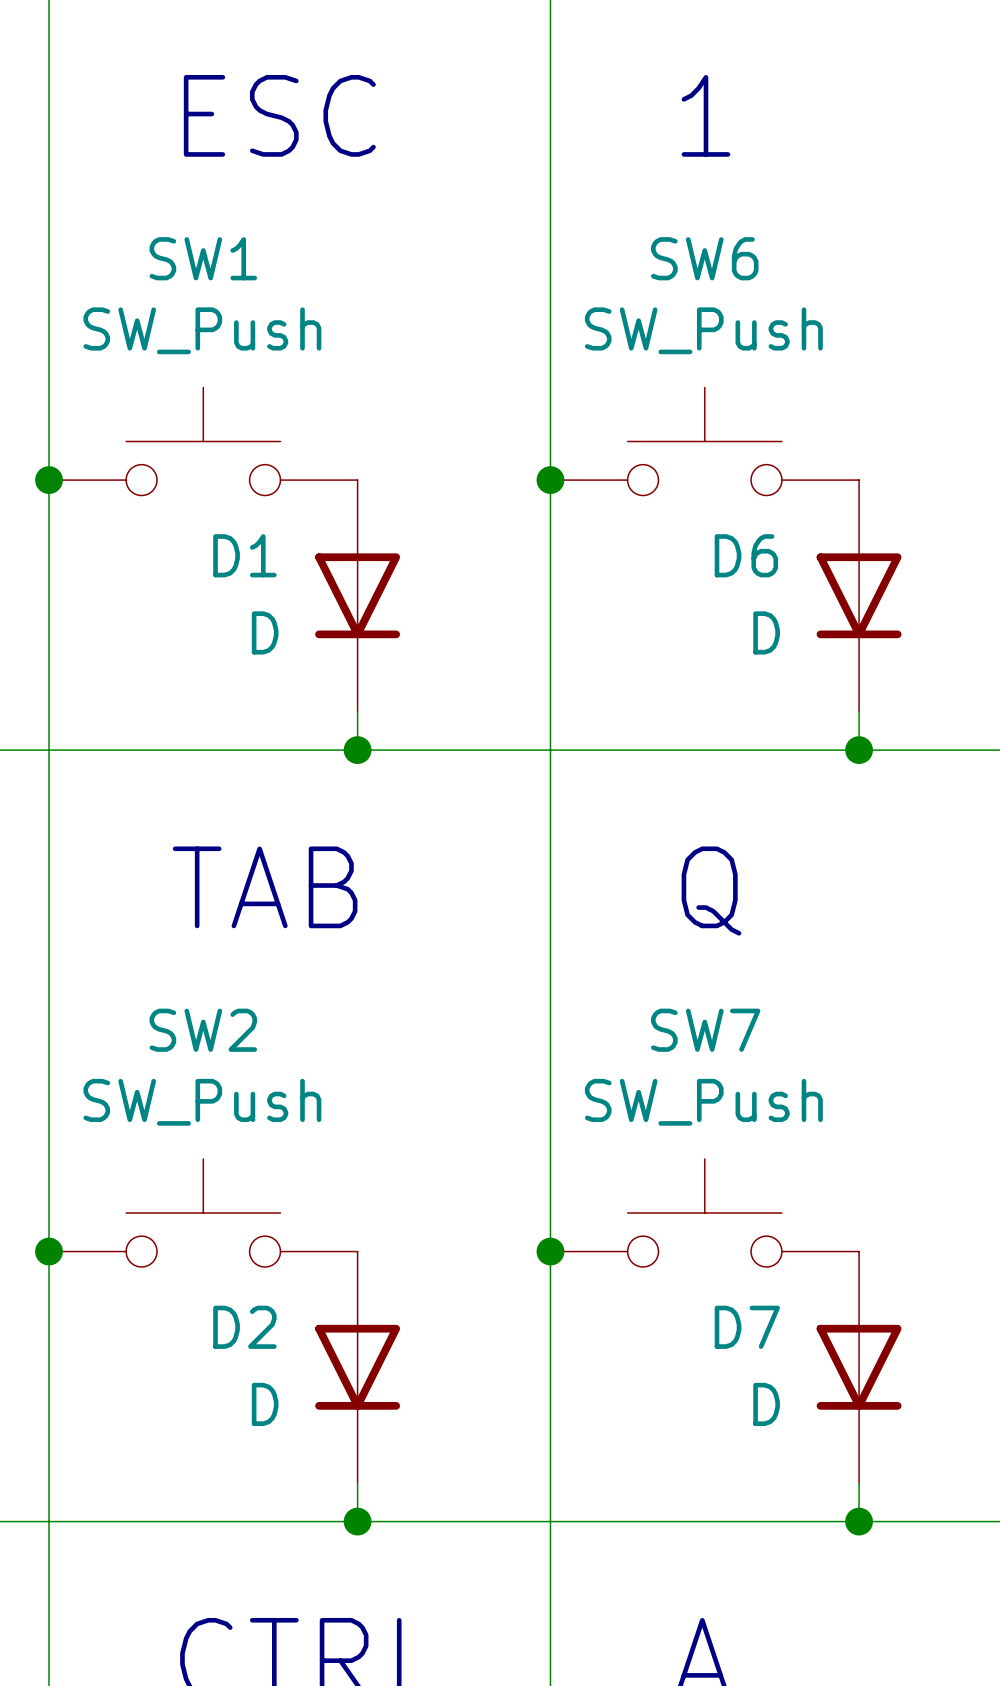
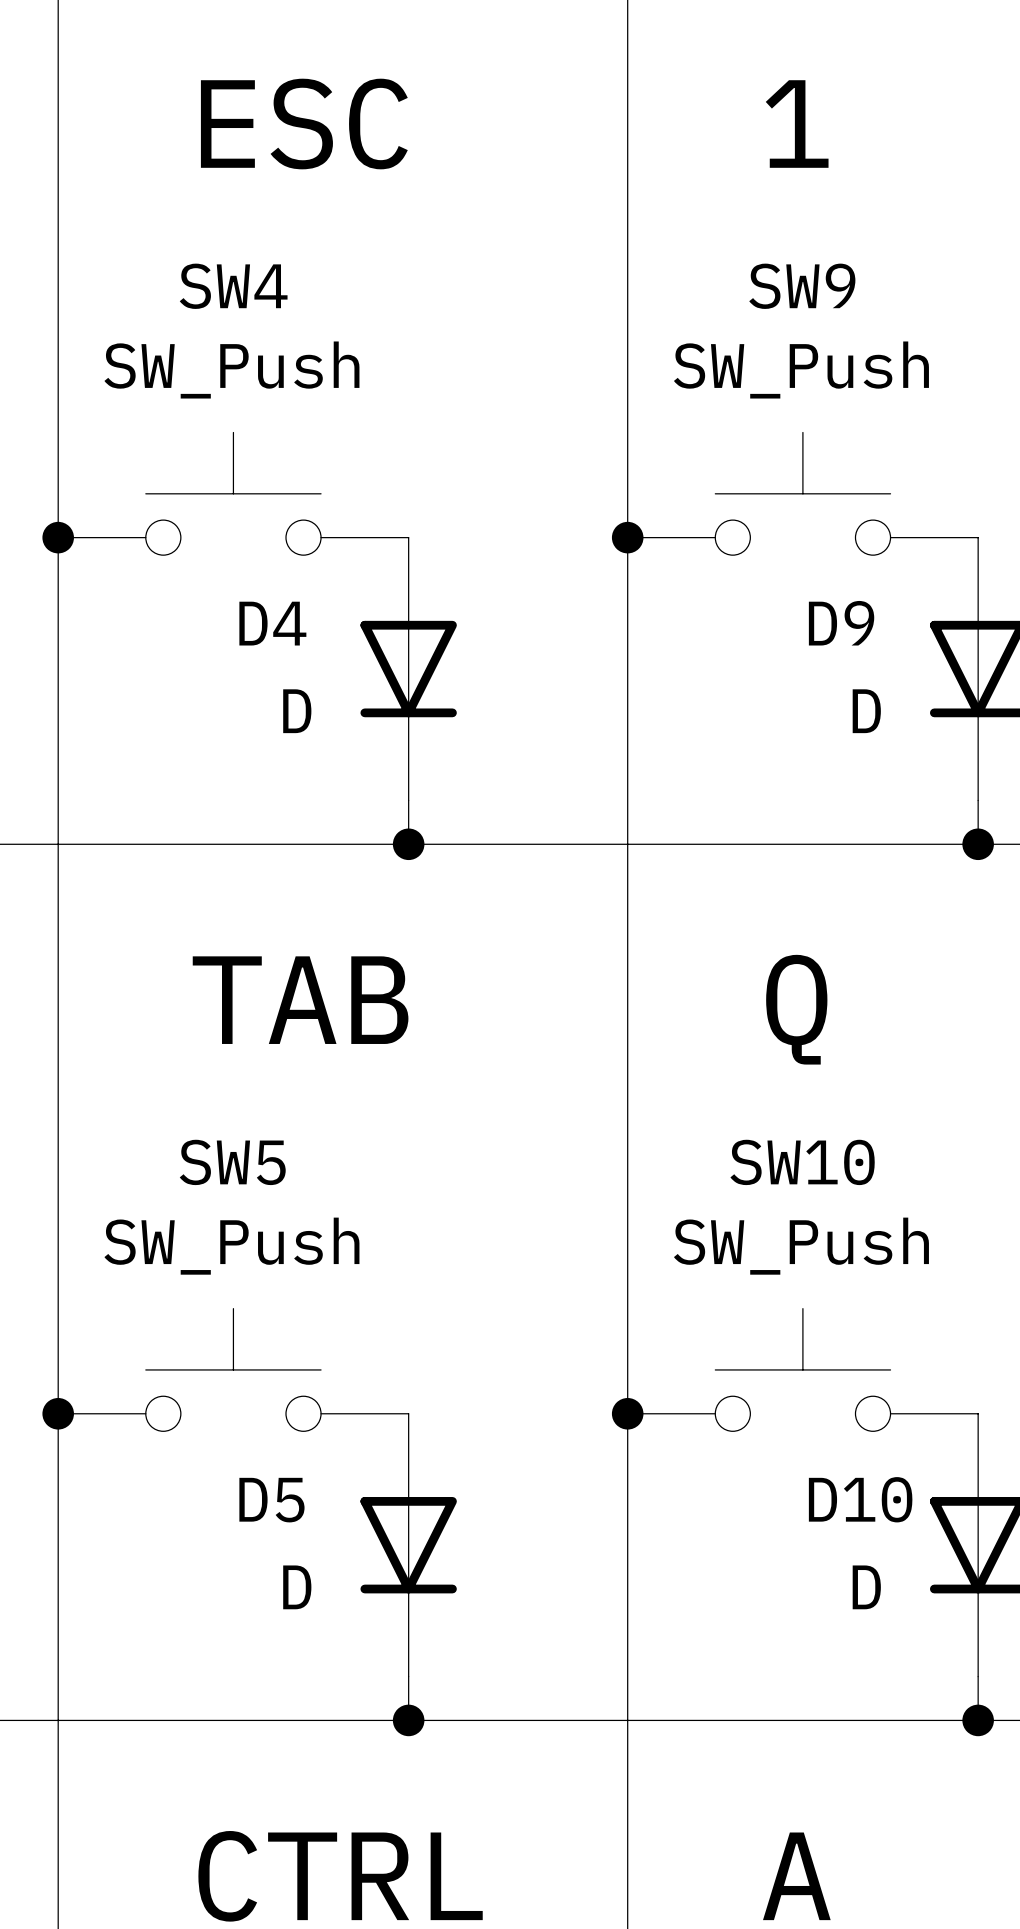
SW1 name: SW1 (203, 258) -> SW4 (233, 286)
SW6 name: SW6 (704, 258) -> SW9 (802, 286)
D1 name: D1 (244, 555) -> D4 (272, 623)
D6 name: D6 (746, 555) -> D9 (841, 623)
SW2 name: SW2 (203, 1030) -> SW5 (232, 1162)
SW7 name: SW7 (705, 1030) -> SW10 (802, 1162)
D2 name: D2 (244, 1327) -> D5 (271, 1500)
D7 name: D7 (747, 1327) -> D10 (860, 1499)

